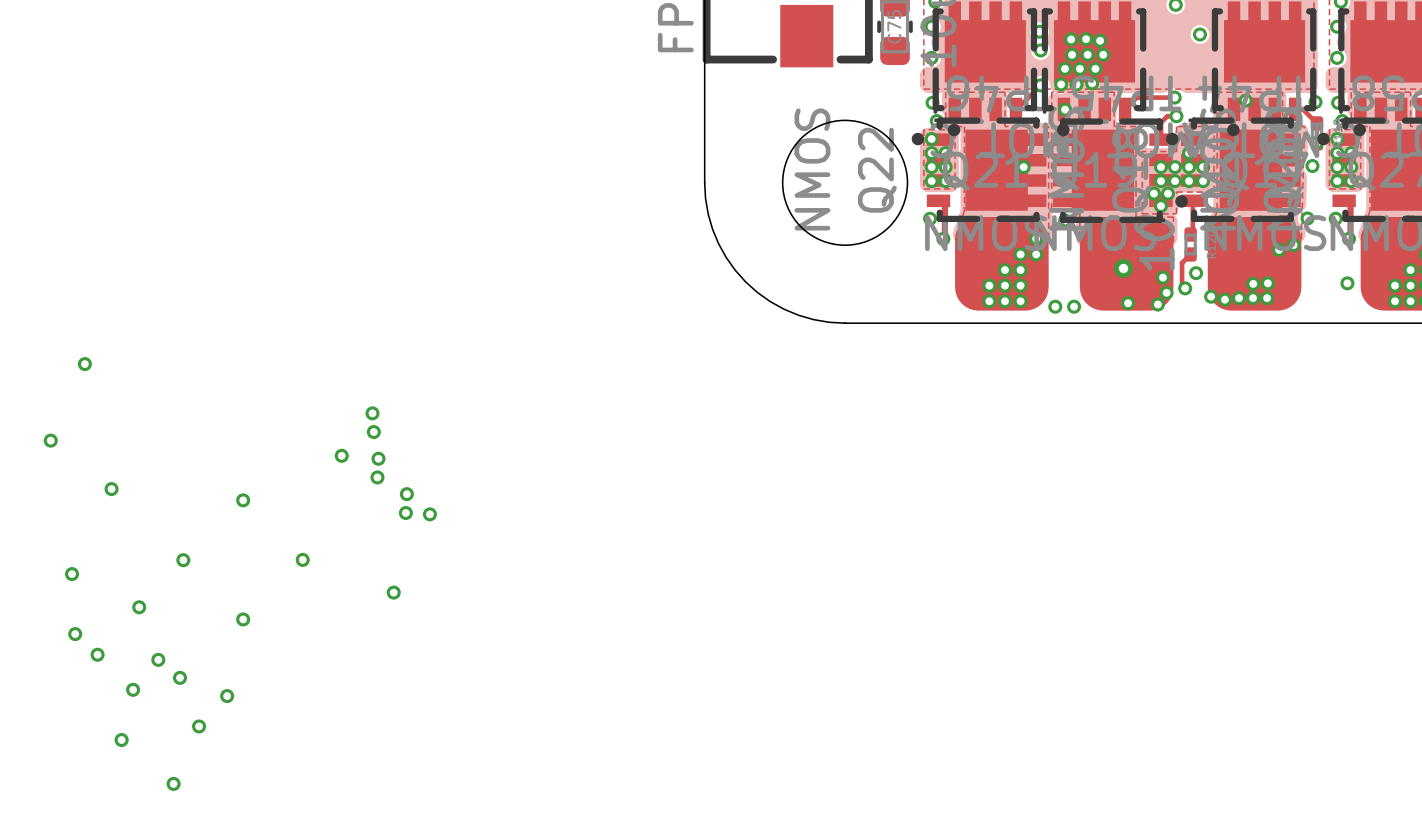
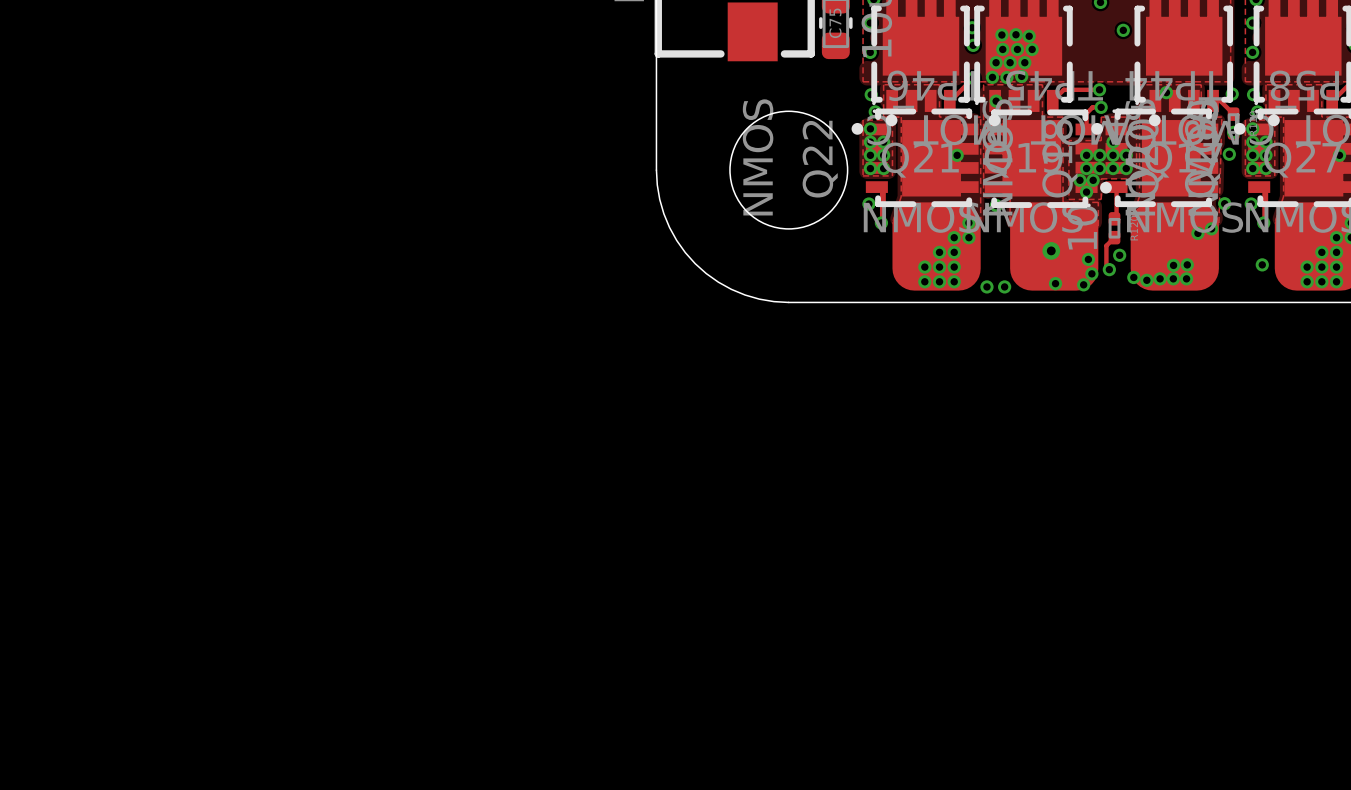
via: (84, 364) -> none
via: (372, 413) -> none
via: (373, 432) -> none
via: (50, 440) -> none
via: (341, 455) -> none
via: (378, 458) -> none
via: (377, 477) -> none
via: (111, 489) -> none
via: (406, 494) -> none
via: (243, 500) -> none
via: (405, 513) -> none
via: (429, 514) -> none
via: (302, 559) -> none
via: (183, 560) -> none
via: (72, 574) -> none
via: (393, 592) -> none
via: (139, 607) -> none
via: (243, 619) -> none
via: (75, 634) -> none
via: (97, 654) -> none
via: (158, 659) -> none
via: (180, 677) -> none
via: (133, 689) -> none
via: (227, 696) -> none
via: (199, 726) -> none
via: (121, 740) -> none
via: (173, 783) -> none

